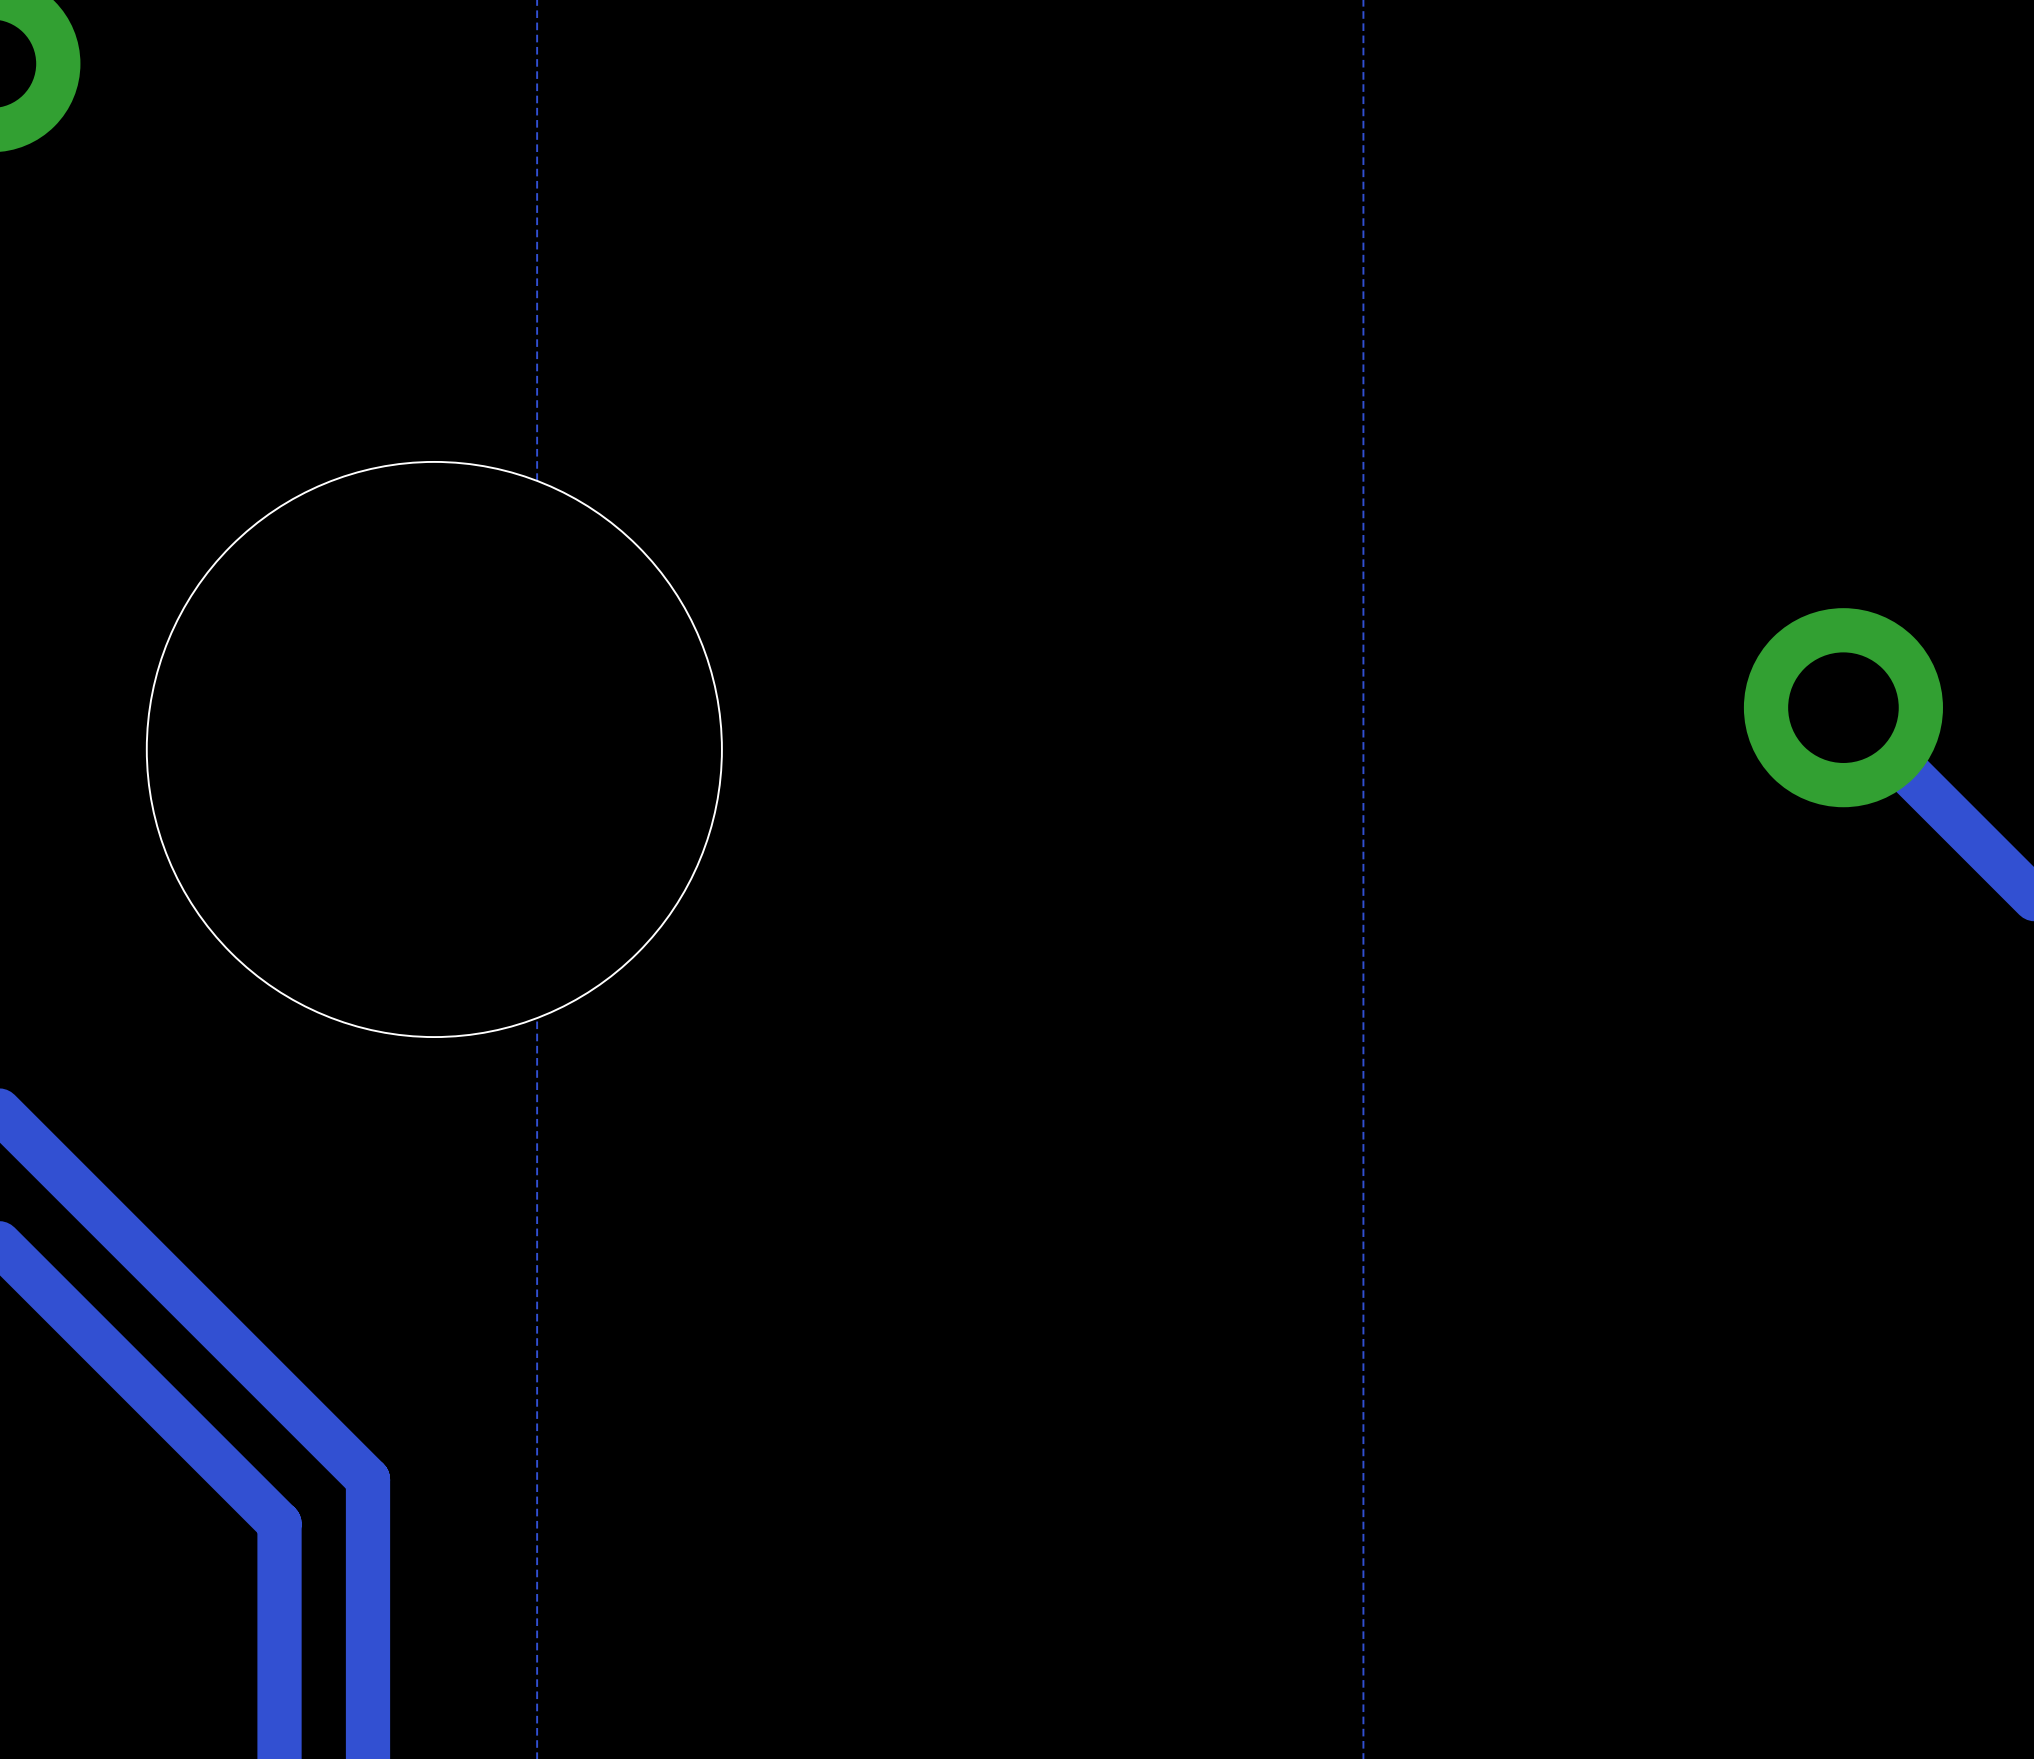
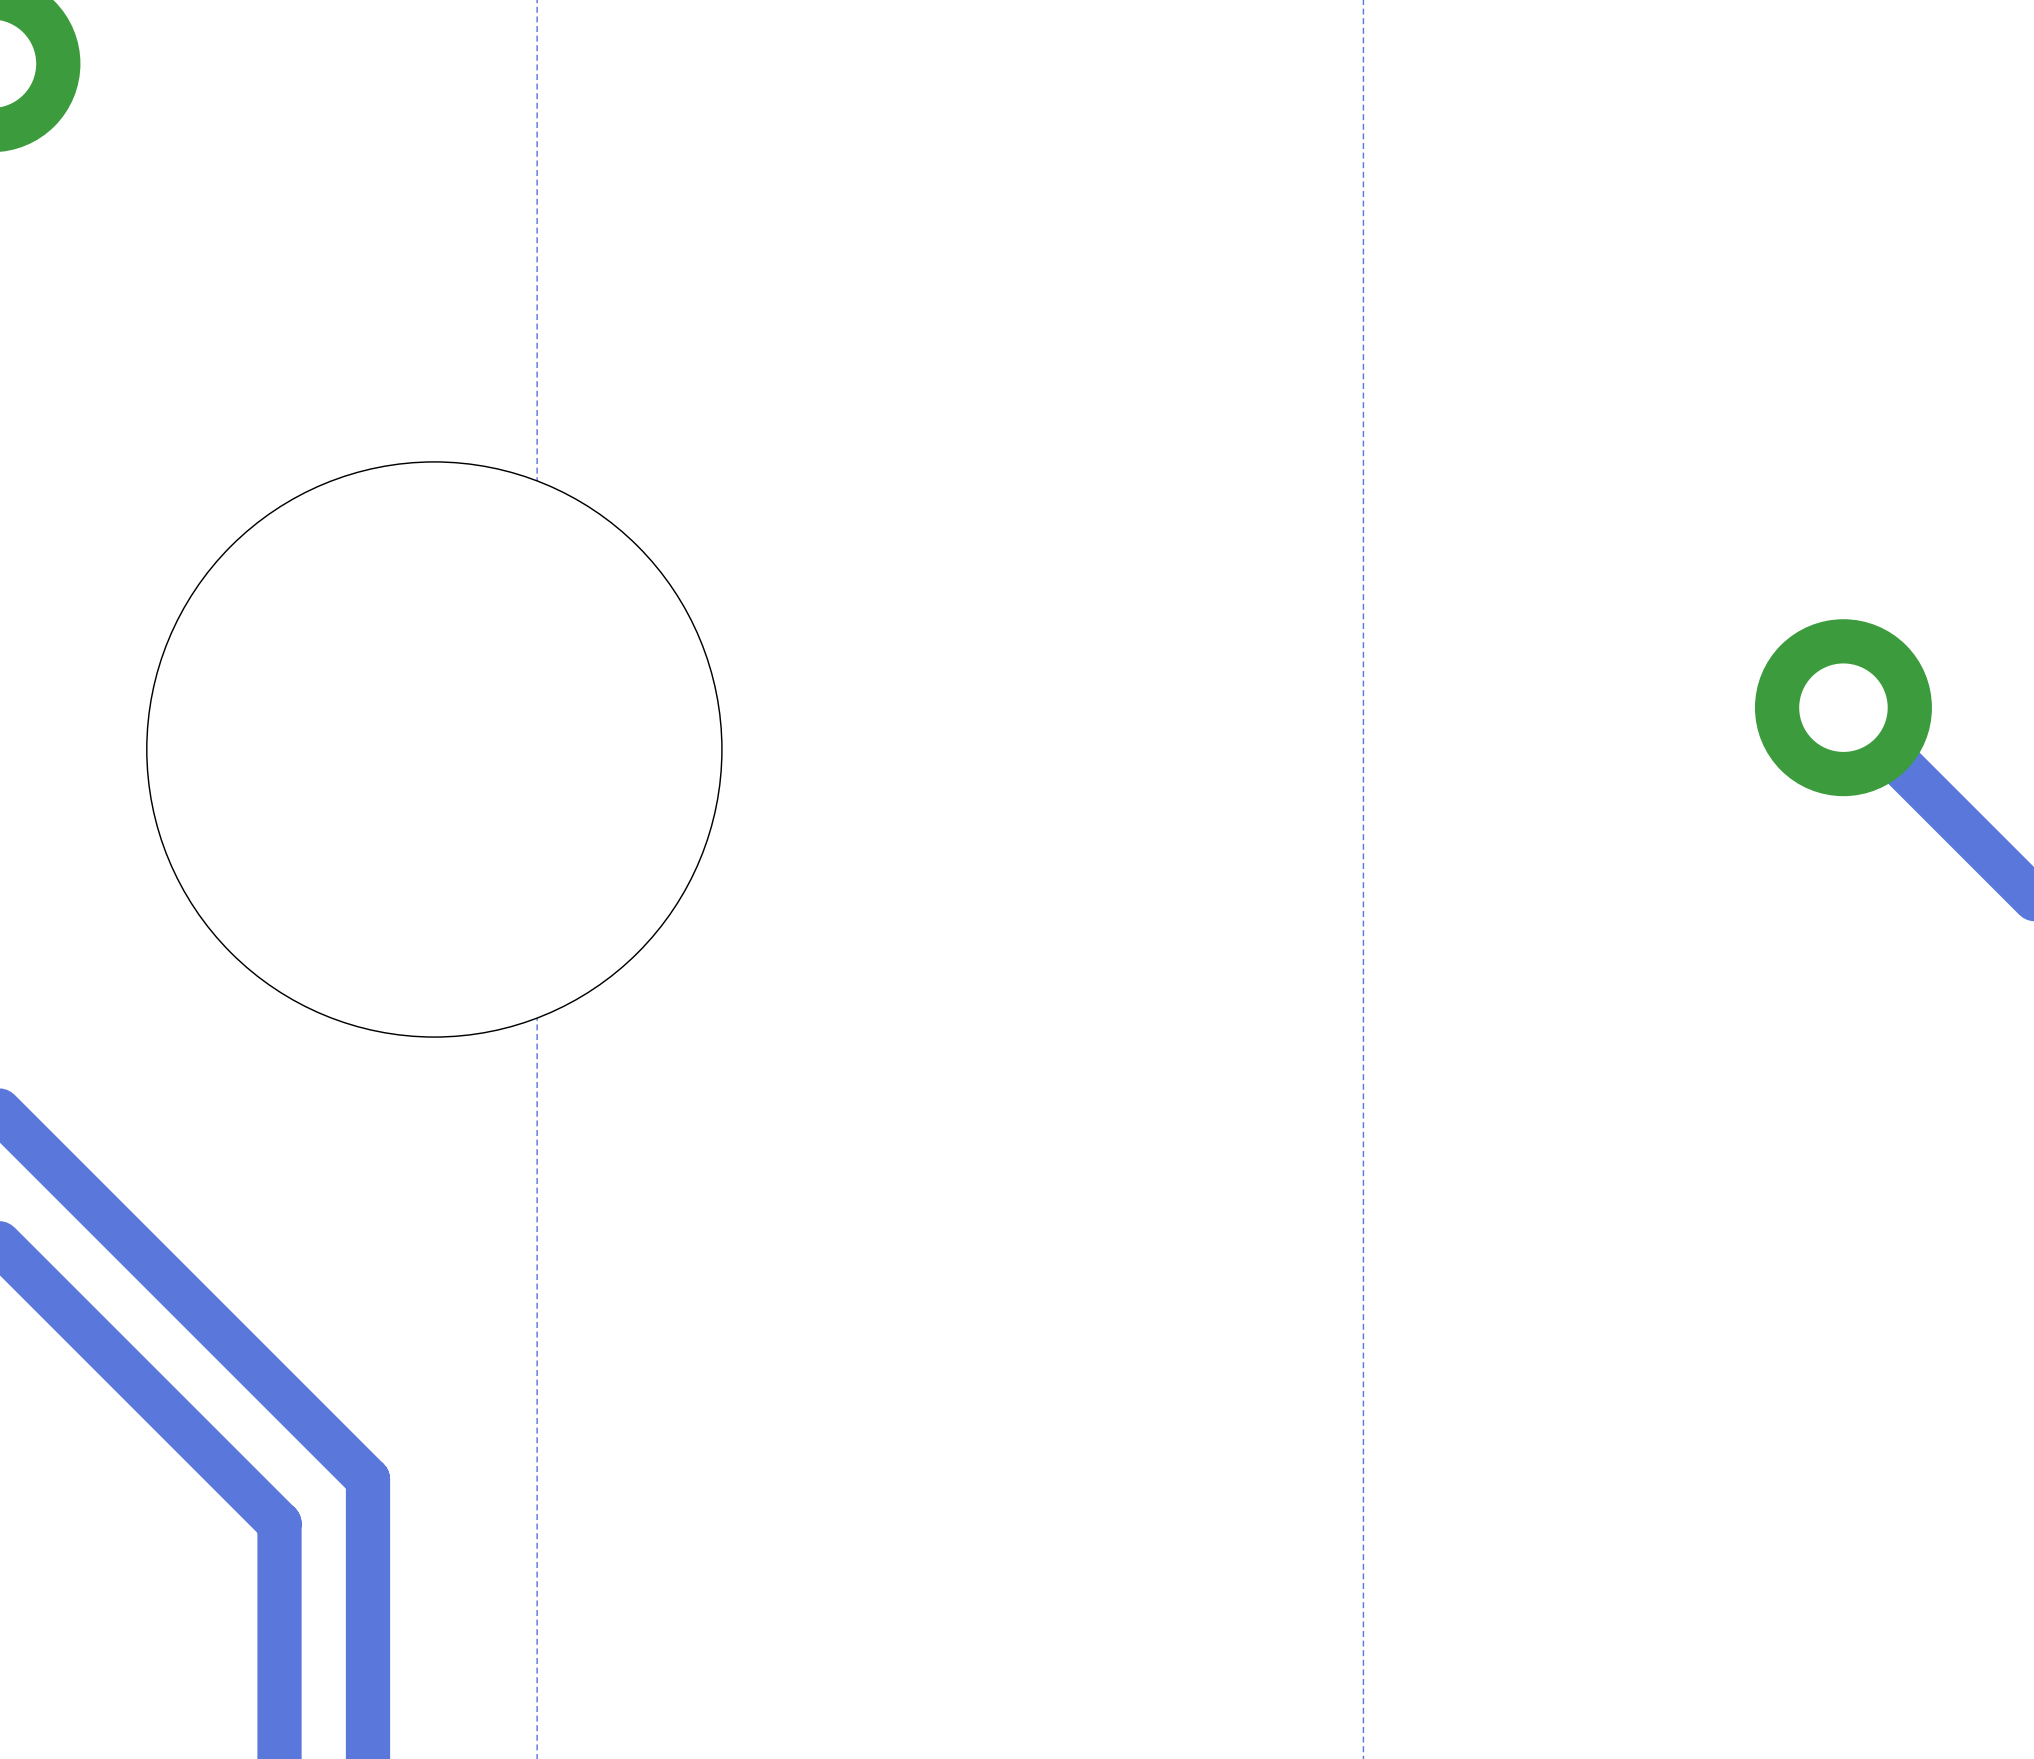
via size: [1743, 608, 1943, 808] -> [1754, 619, 1932, 797]

